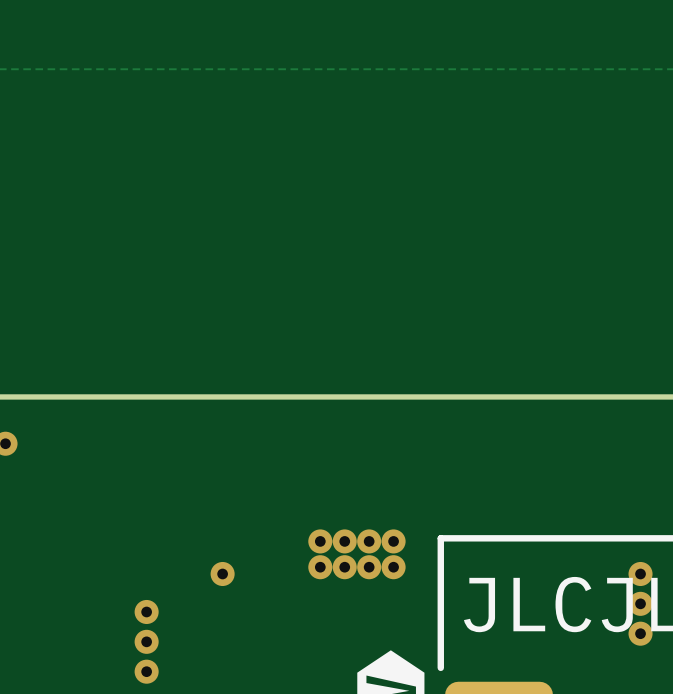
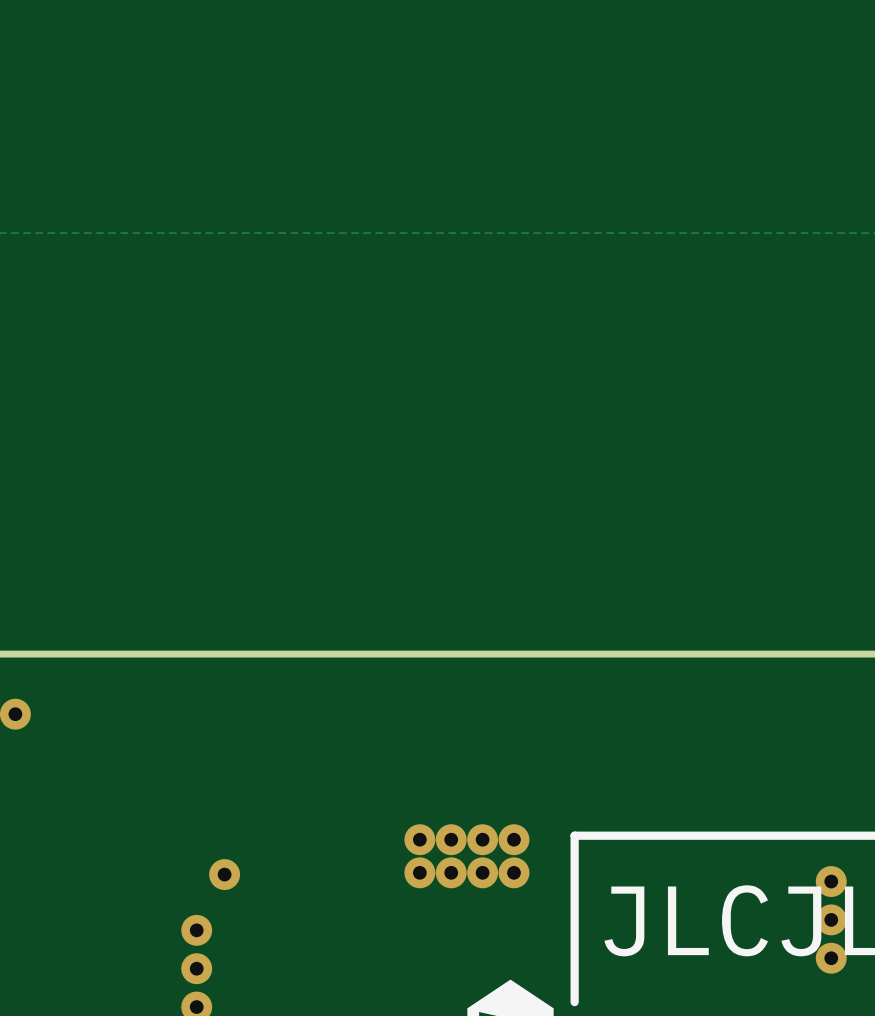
via position: (222, 573) -> (224, 874)

